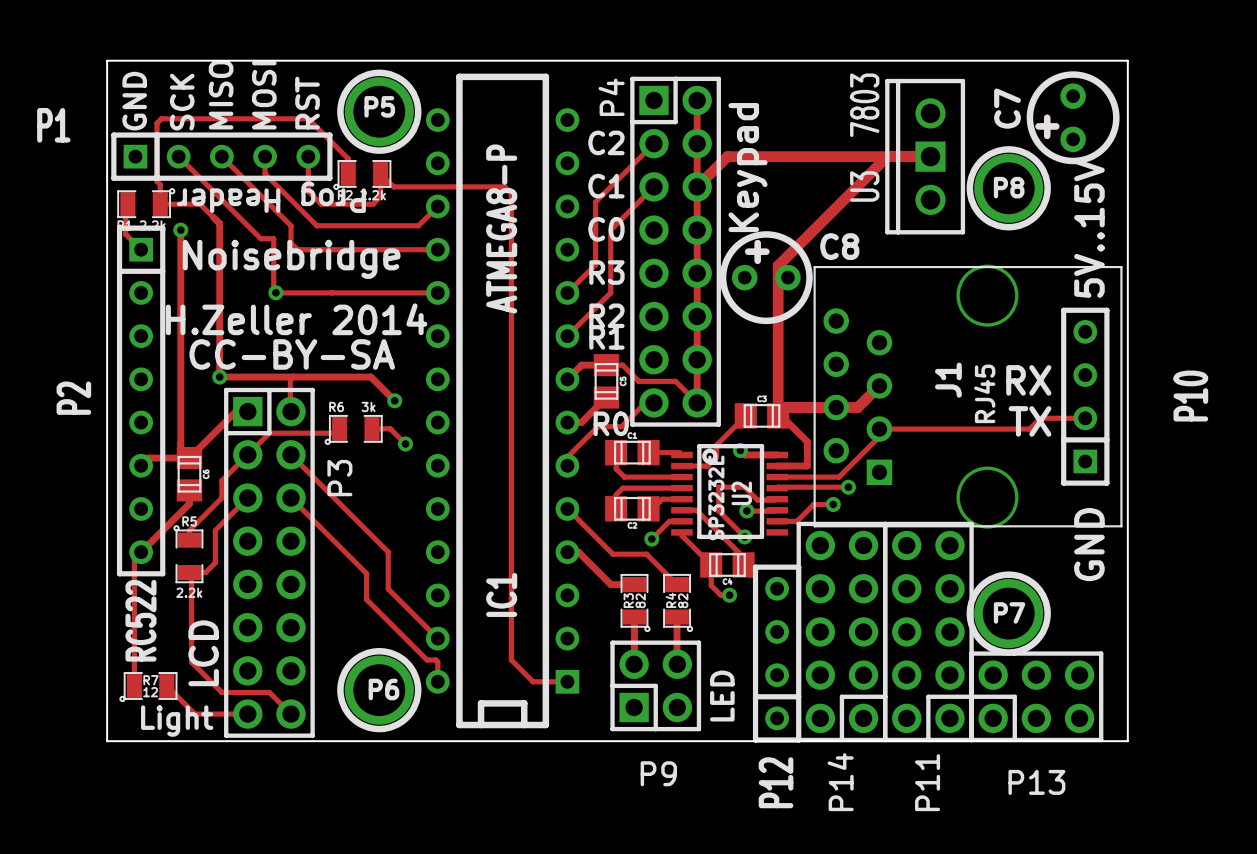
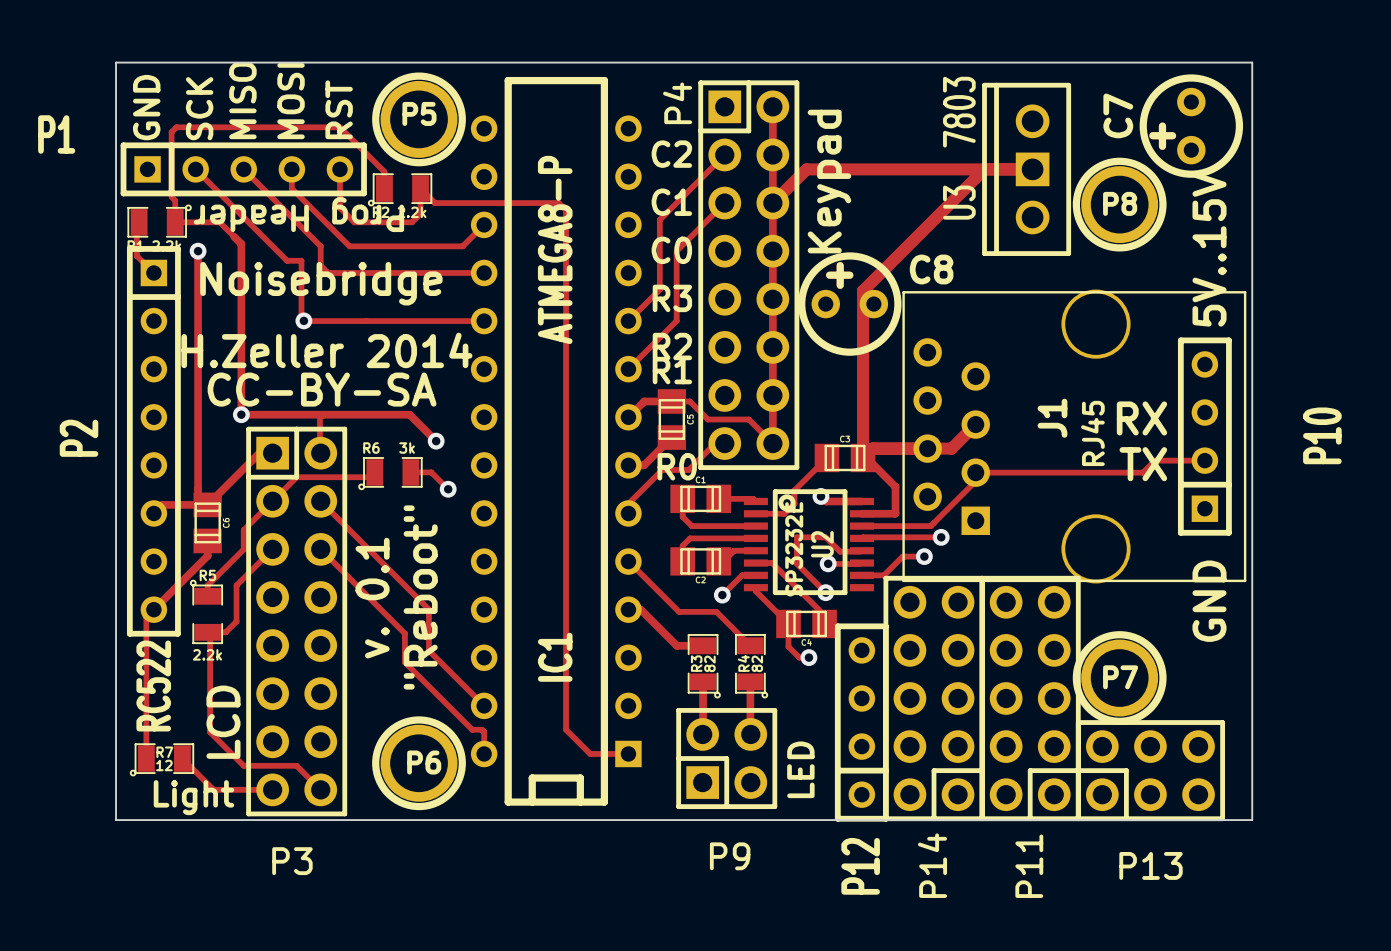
P3 name rotation: 0° (339, 478) -> 90° clockwise (292, 861)
P3 name position: P3 (339, 478) -> P3 (292, 861)
text: none -> v. 0.1 (372, 598)
text: none -> "Reboot" (420, 597)

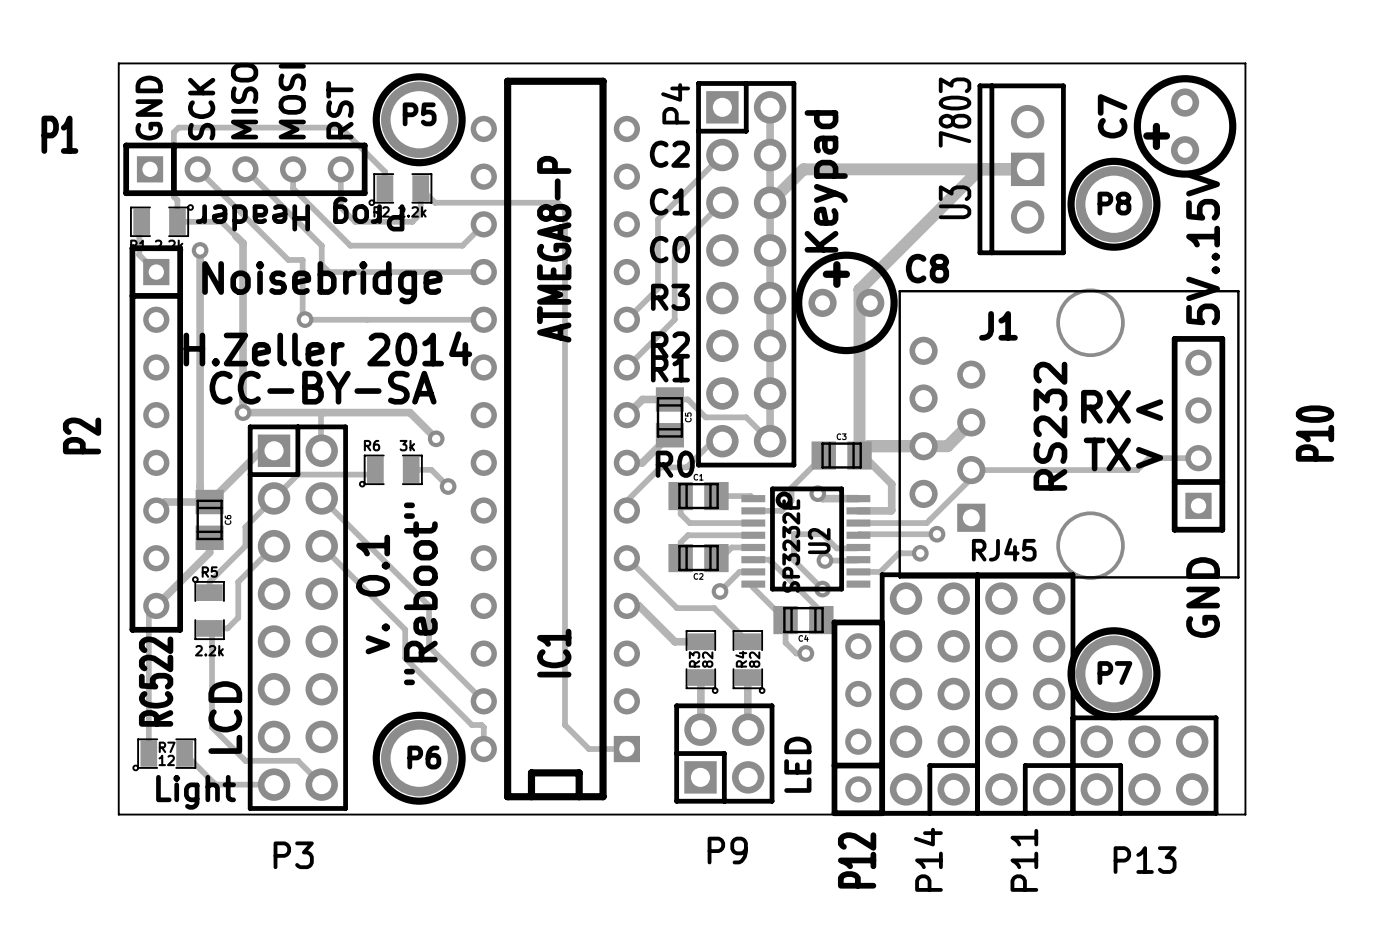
J1 name rotation: 0° (1052, 418) -> 90° clockwise (998, 325)
J1 name position: J1 (1052, 418) -> J1 (998, 325)
text: RX (1141, 418) -> RX< (1122, 406)
text: none -> RS232 (1050, 426)
J1 value rotation: 0° (1092, 433) -> 90° clockwise (1004, 549)
J1 value position: RJ45 (1092, 433) -> RJ45 (1004, 549)
text: TX (1143, 464) -> TX> (1123, 454)

